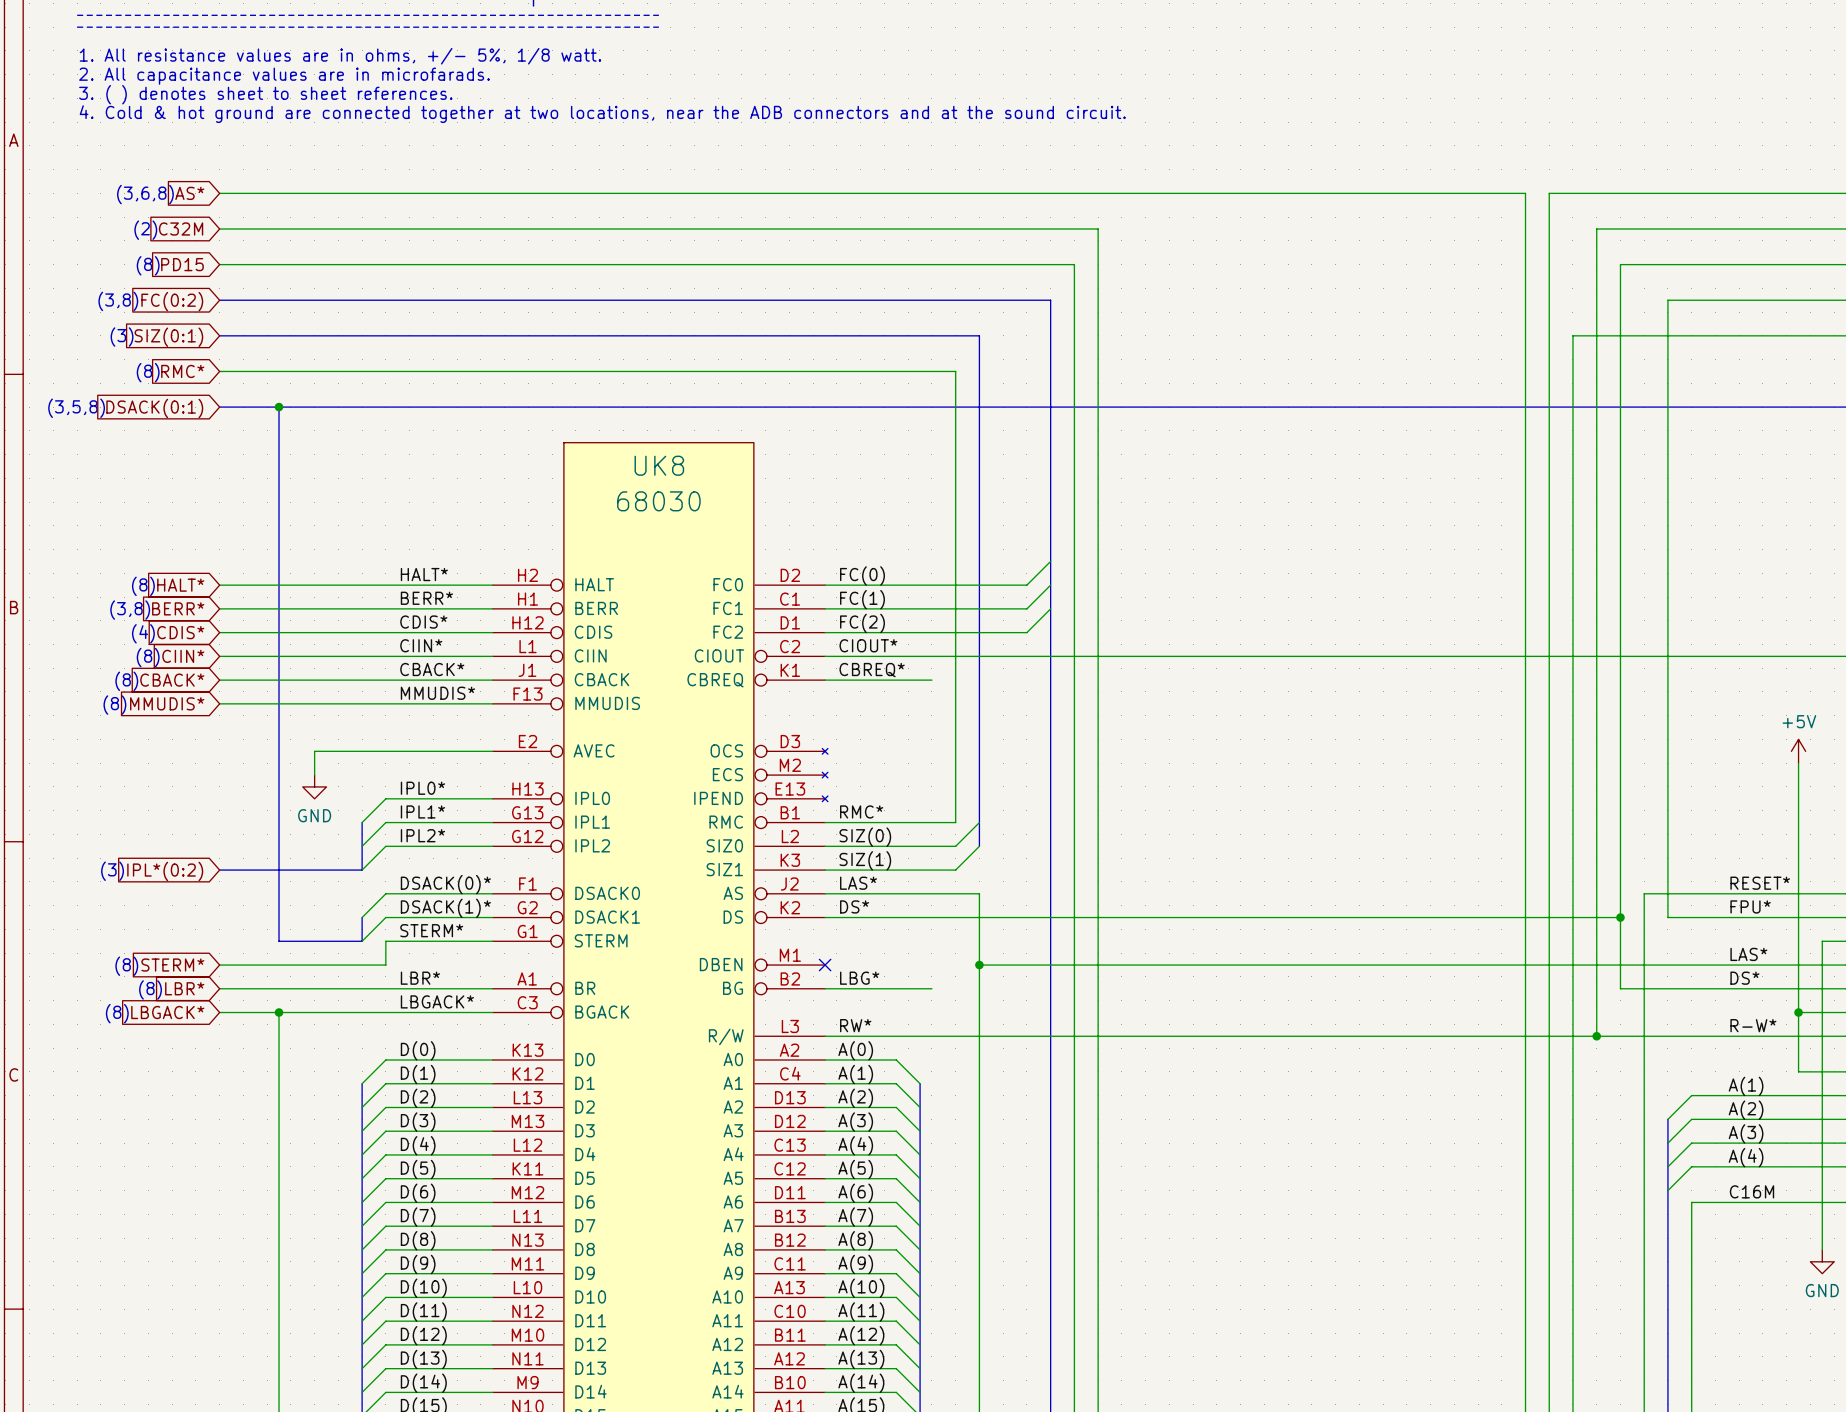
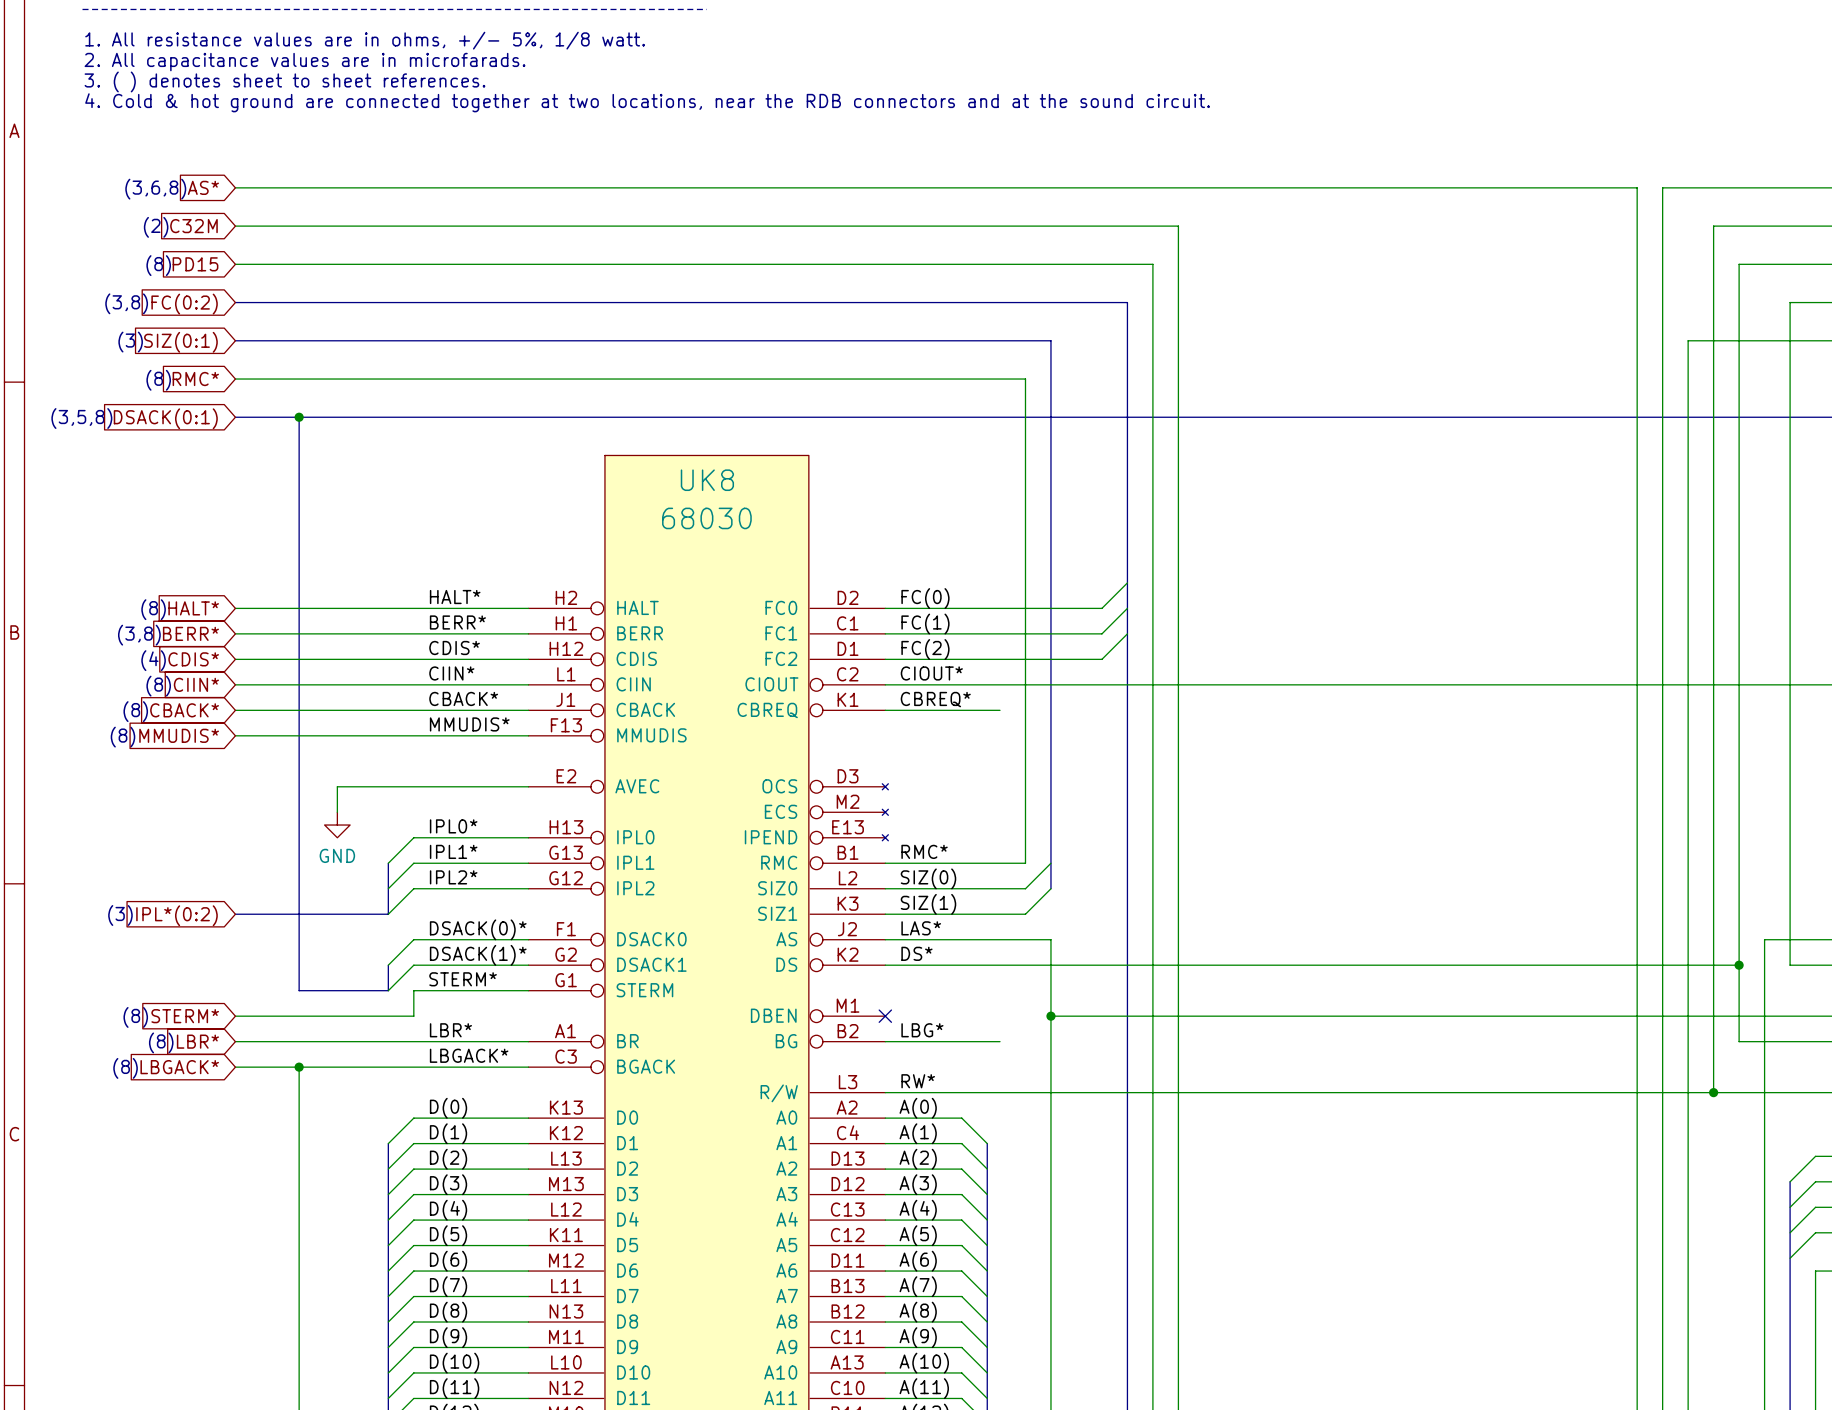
text: 4. Cold & hot ground are connected together at two locations, near the ADB connectors and at the sound circuit. (602, 114) -> 4. Cold & hot ground are connected together at two locations, near the RDB connectors and at the sound circuit. (647, 102)

